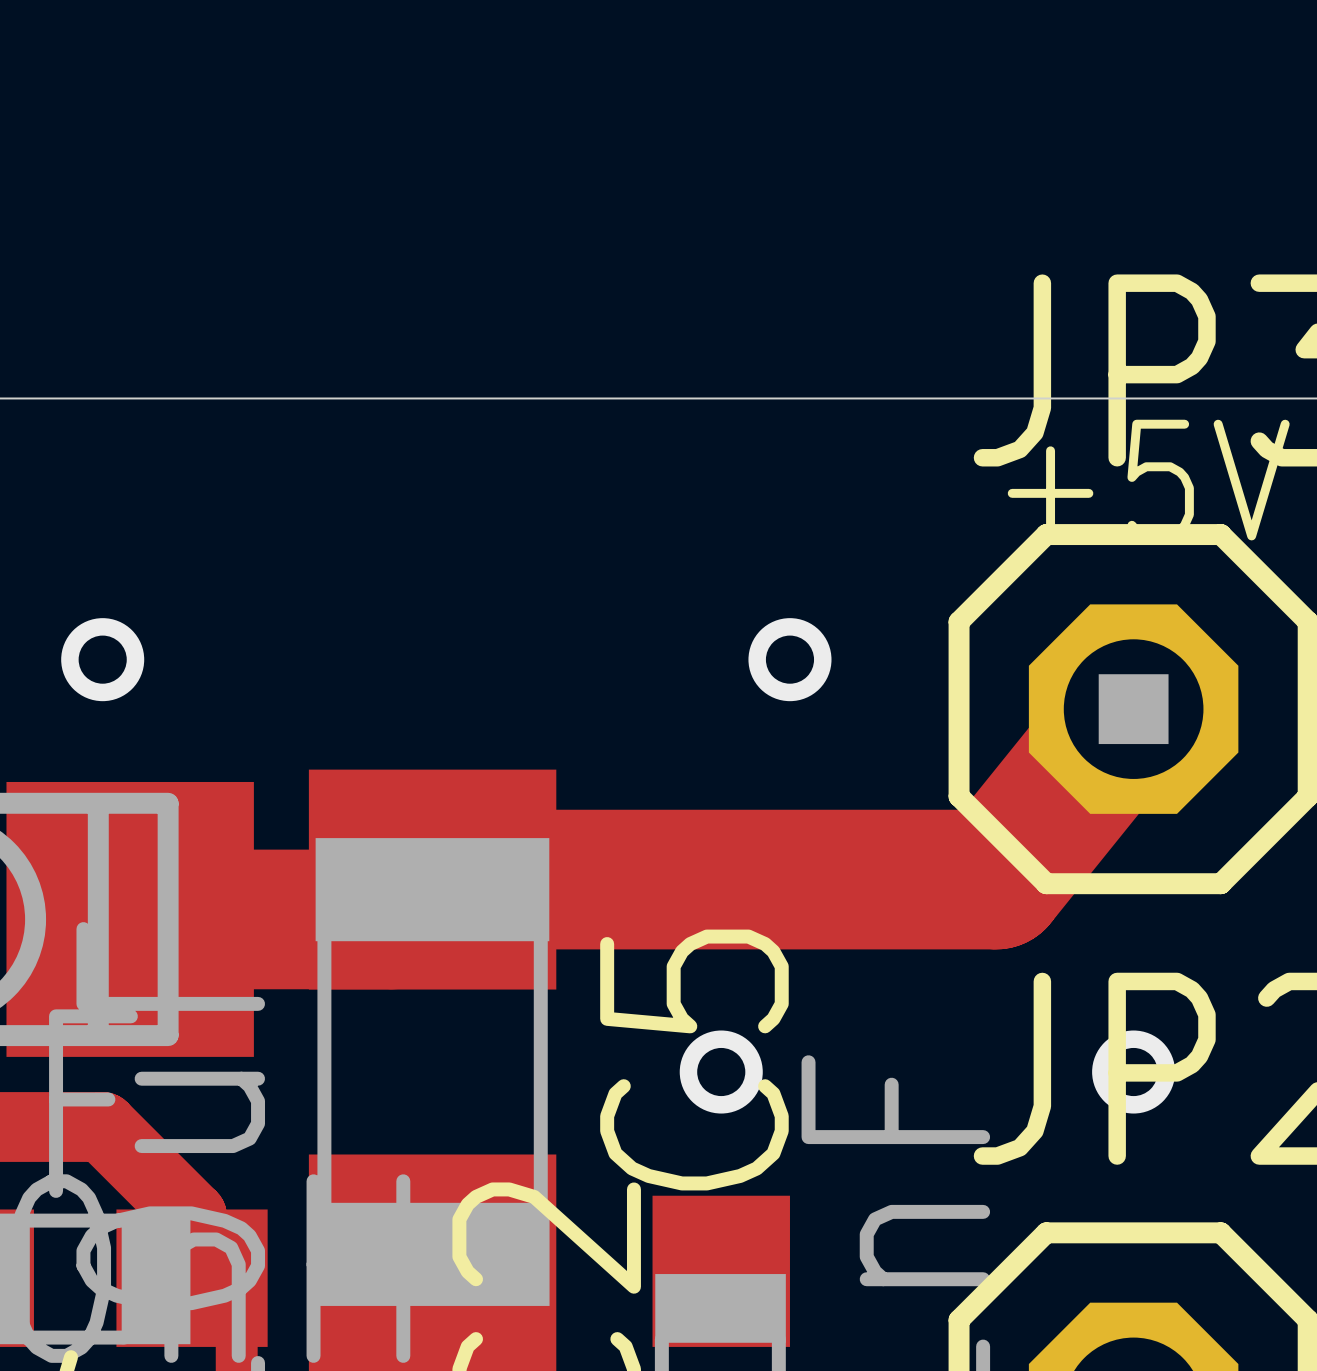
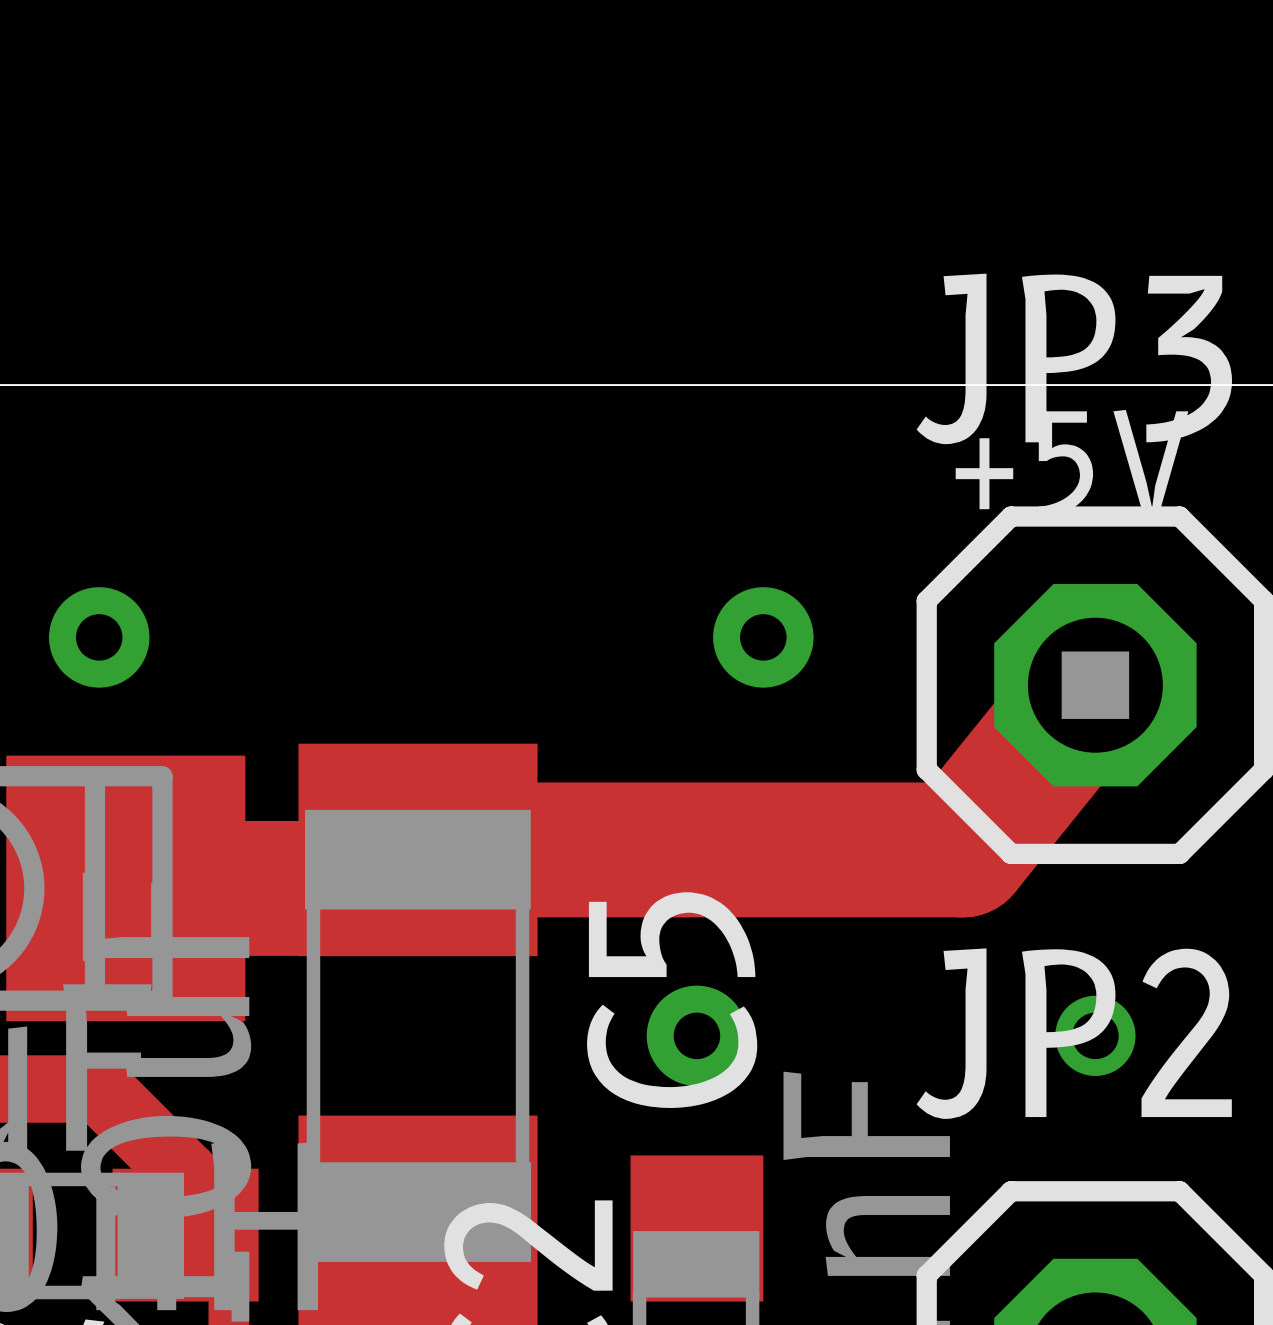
via size: [61, 618, 145, 702] -> [49, 587, 150, 688]
via size: [748, 618, 832, 702] -> [713, 587, 814, 688]
via size: [679, 1030, 763, 1114] -> [646, 985, 748, 1087]

